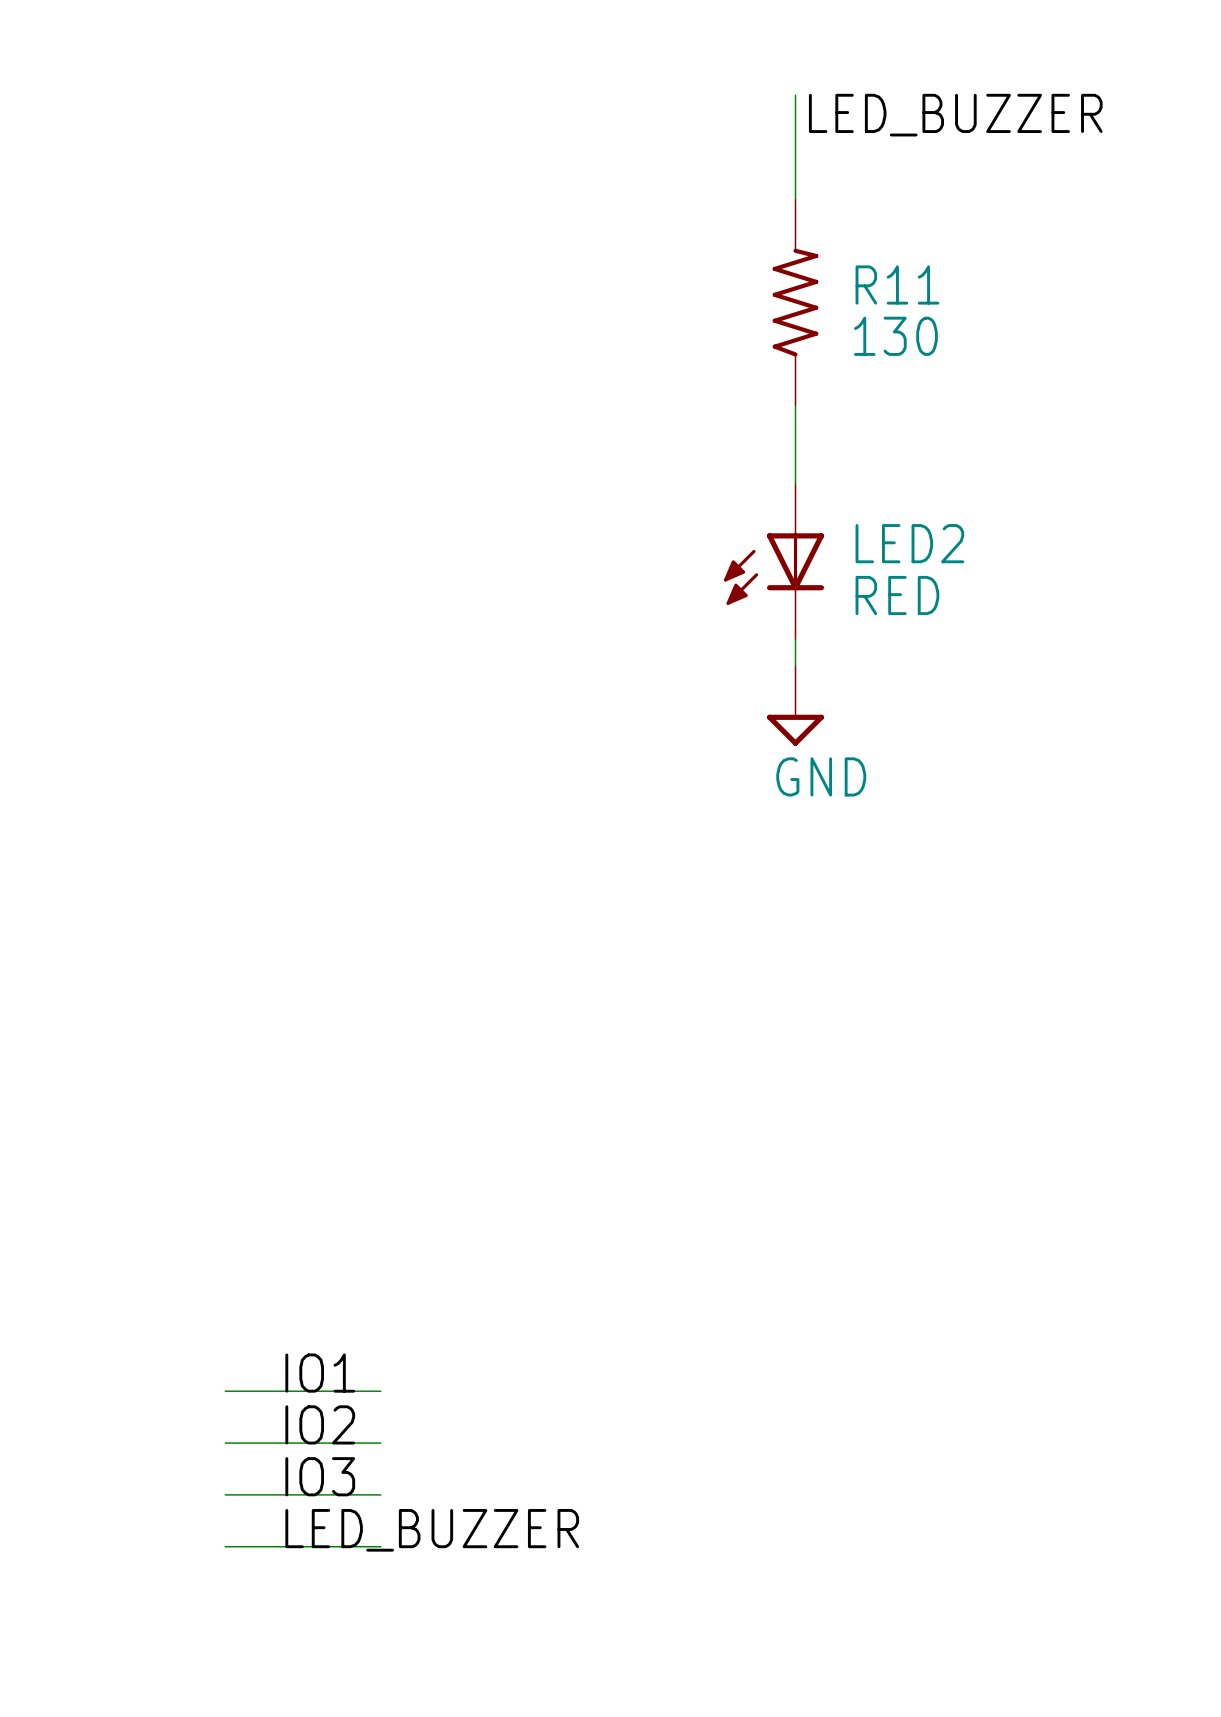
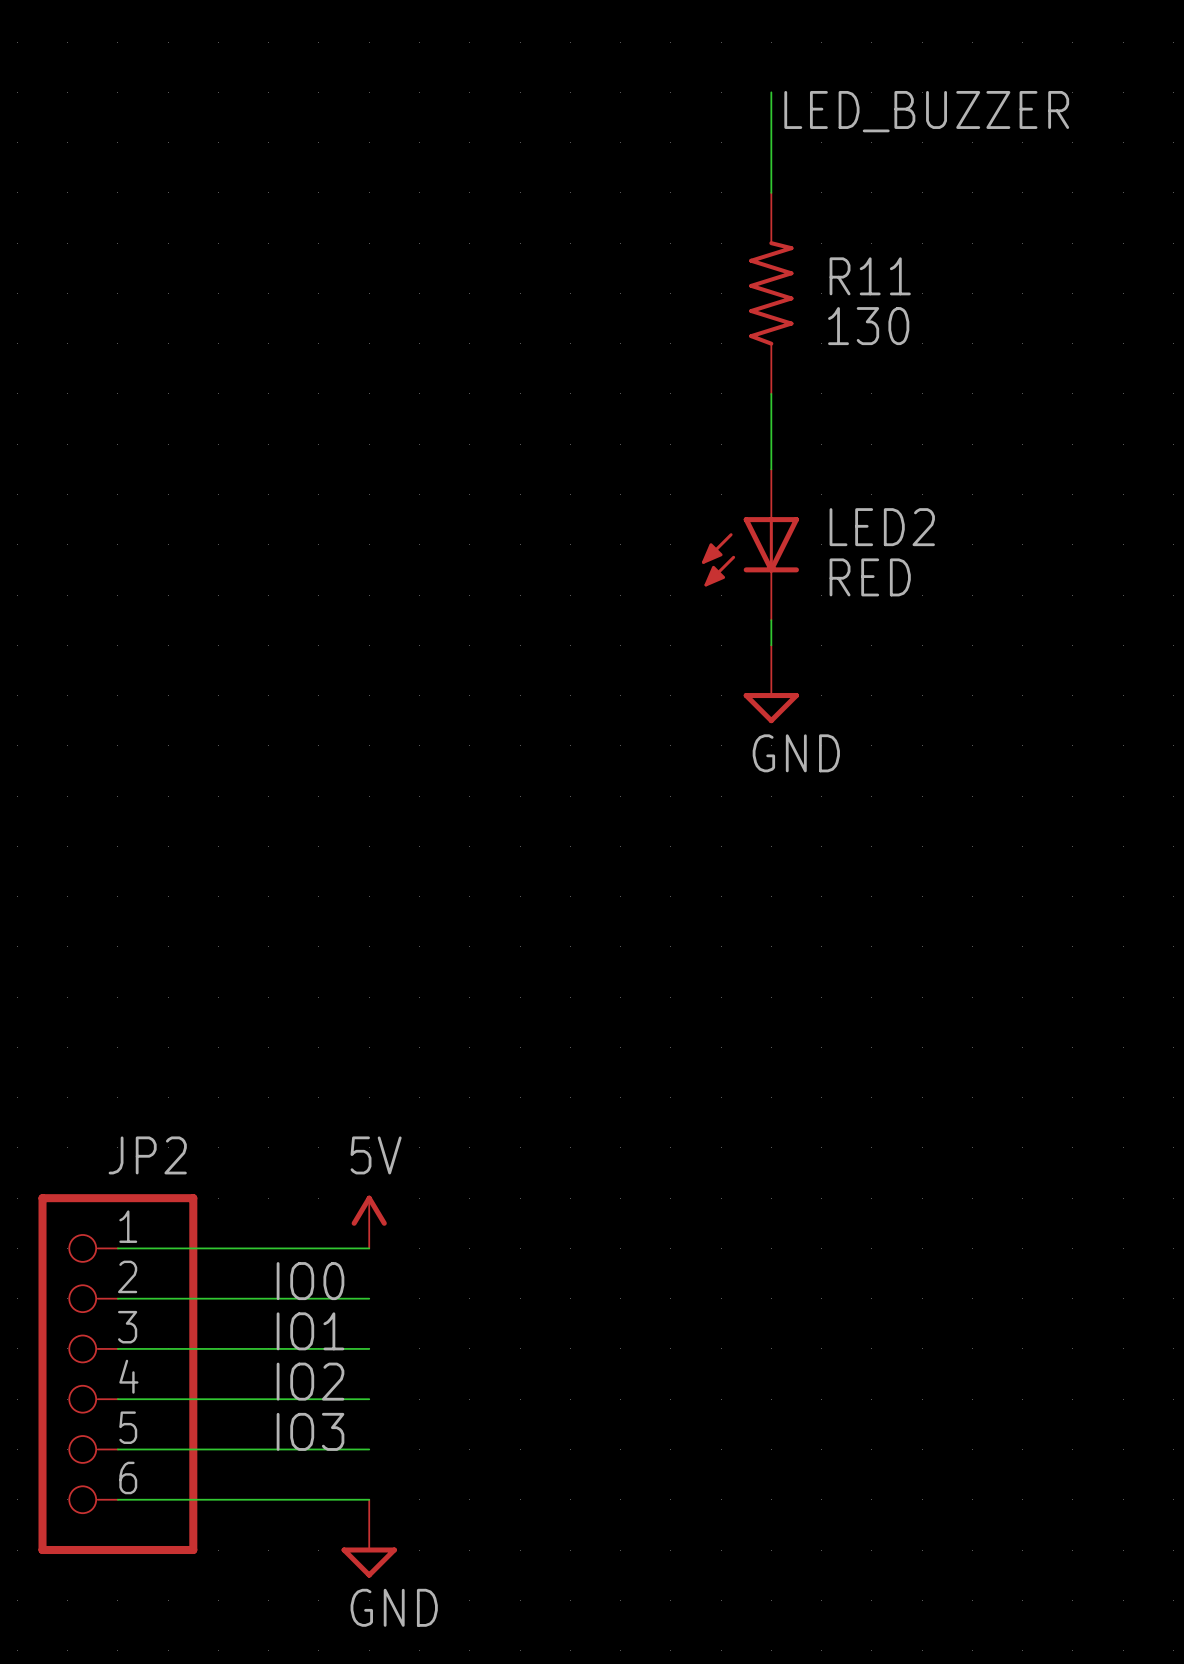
power symbol: none -> 5V (369, 1222)
wire: none -> (117, 1248) (369, 1248)
label: none -> IO0 (310, 1281)
wire: none -> (117, 1298) (369, 1298)
wire: none -> (117, 1348) (218, 1348)
JP2: none -> (117, 1374)
wire: none -> (117, 1399) (218, 1399)
wire: none -> (117, 1449) (218, 1449)
label: LED_BUZZER (432, 1530) -> none
wire: none -> (117, 1499) (218, 1499)
power symbol: none -> GND (369, 1538)

